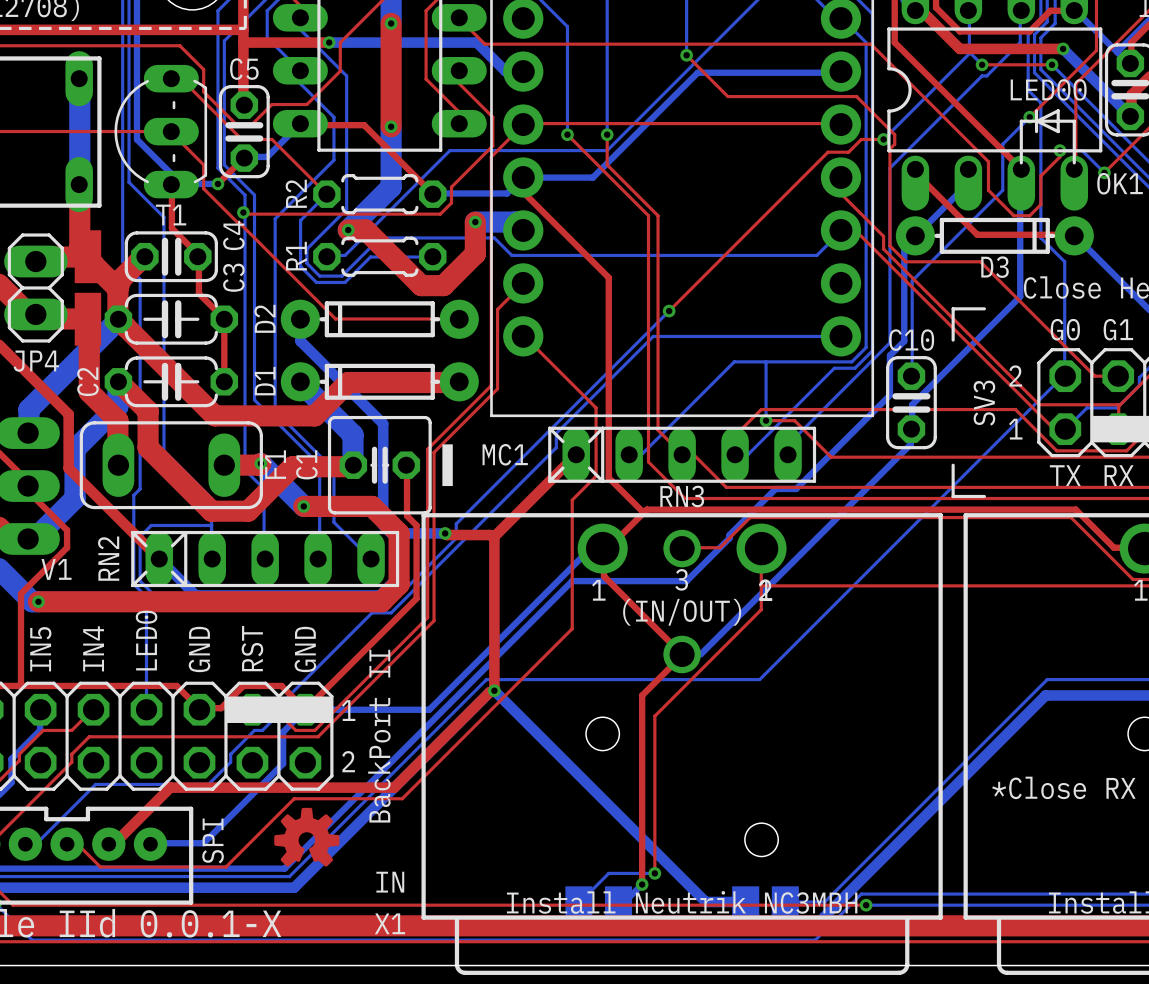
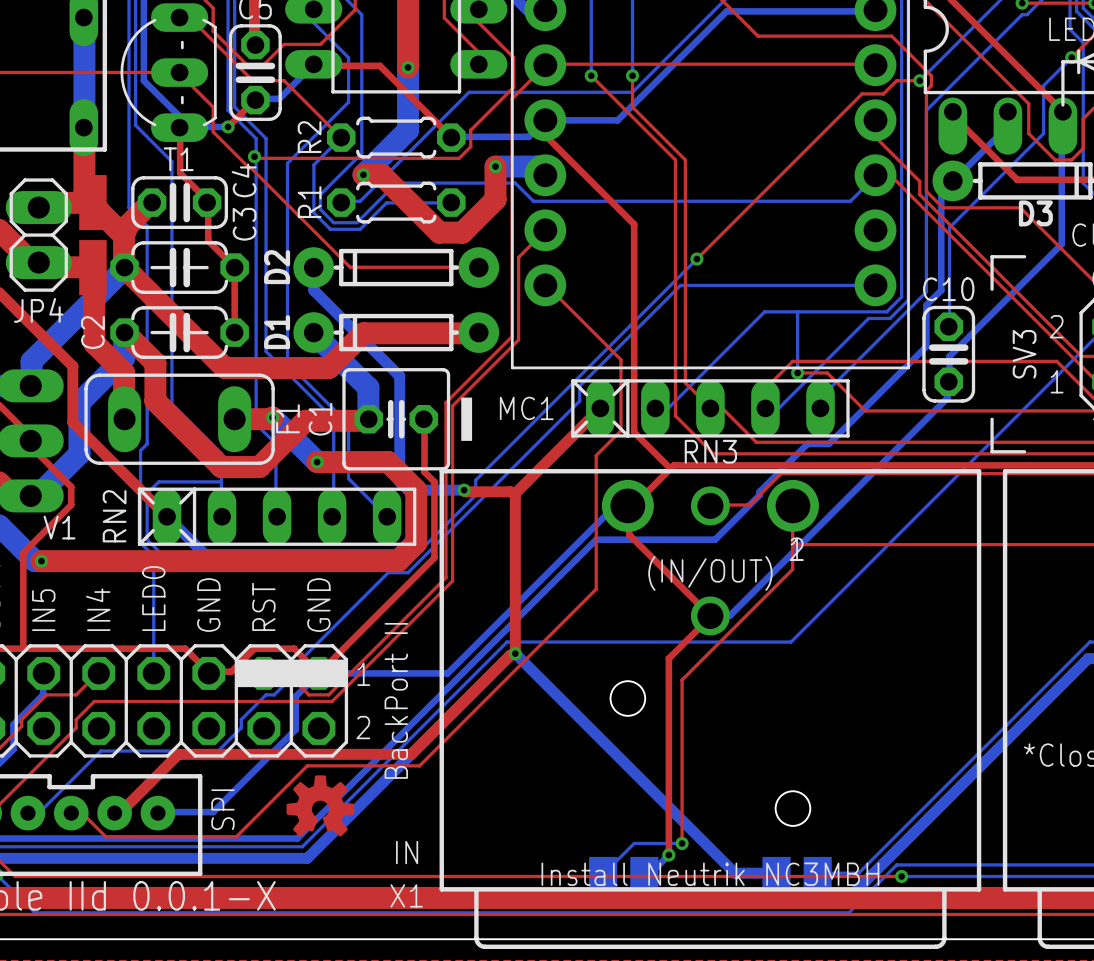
text: 3 (681, 579) -> none
text: 1 (598, 590) -> none

